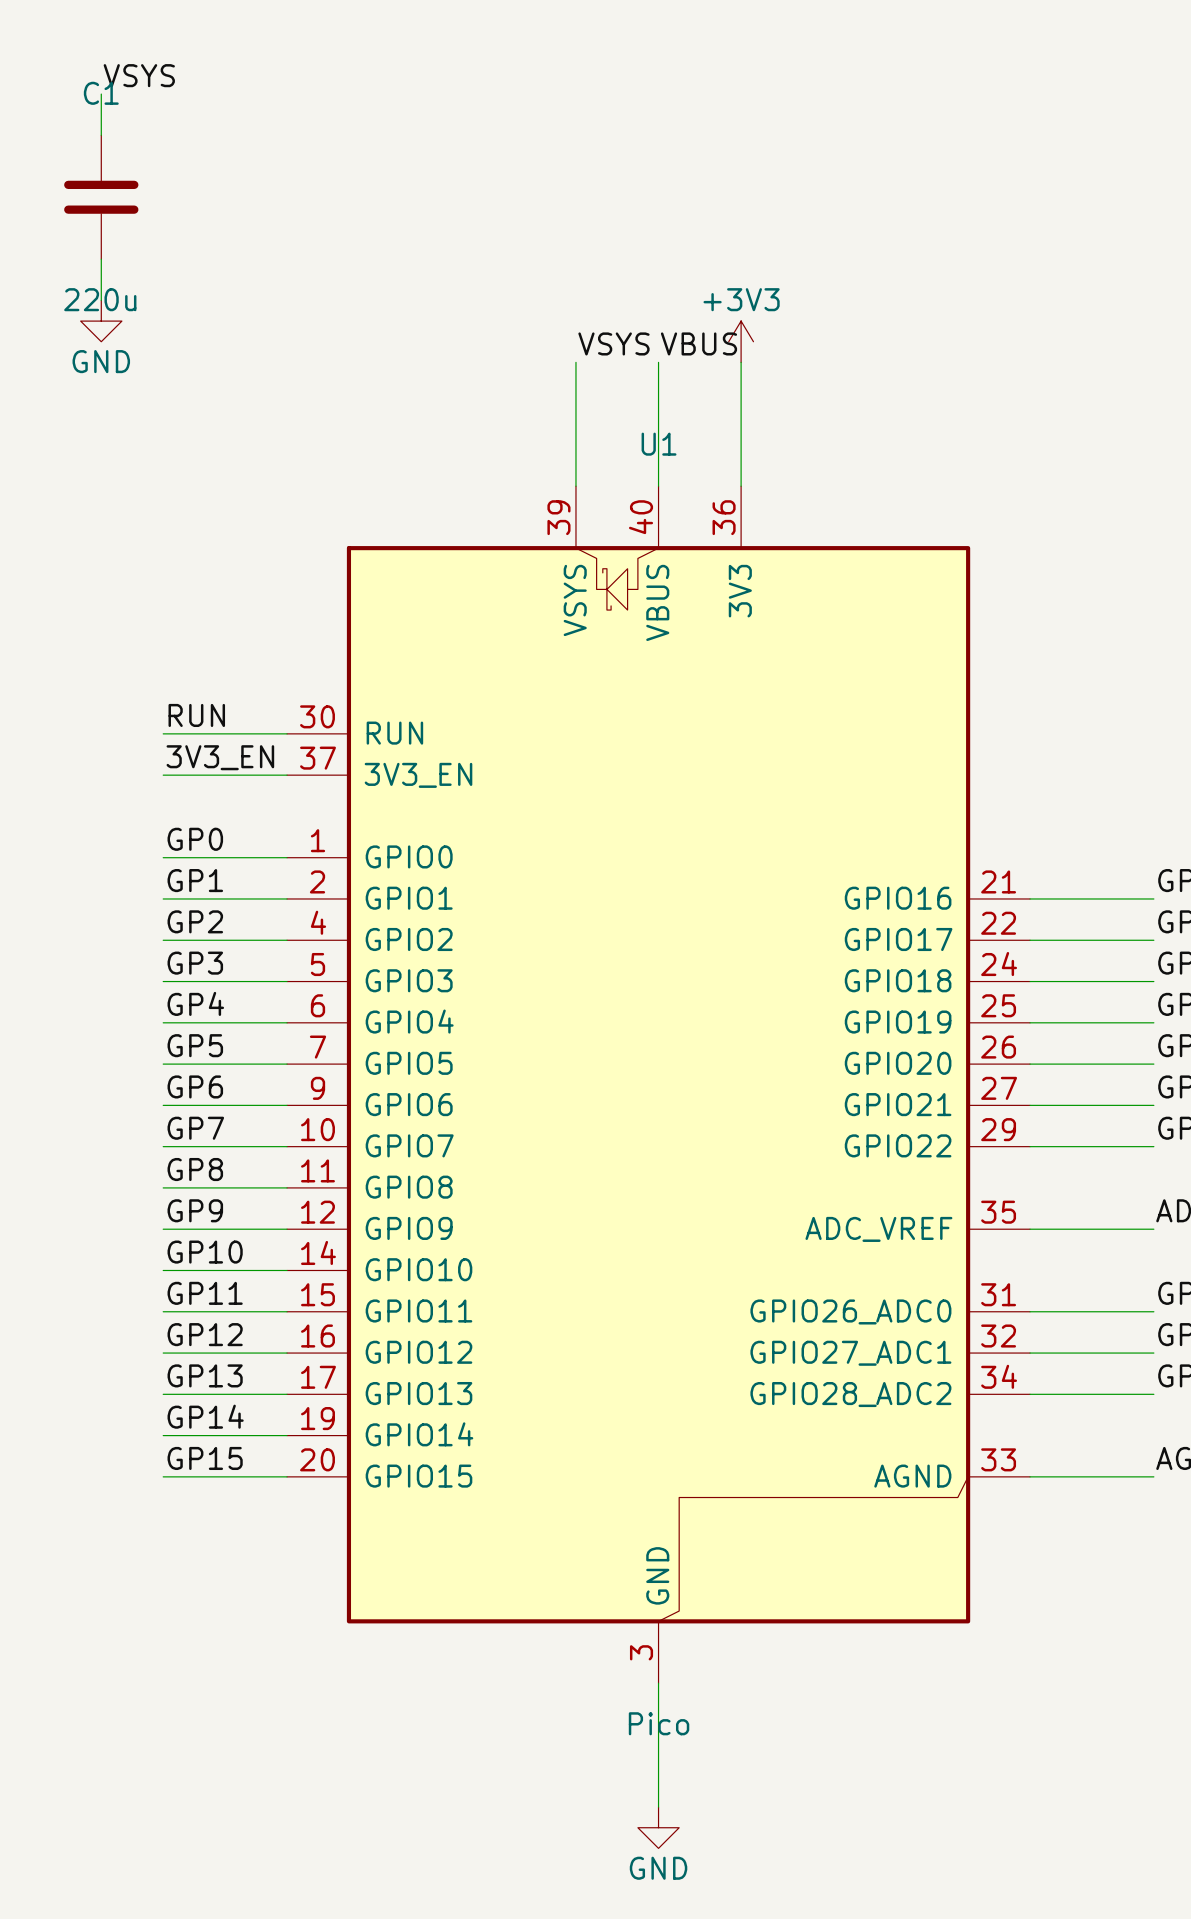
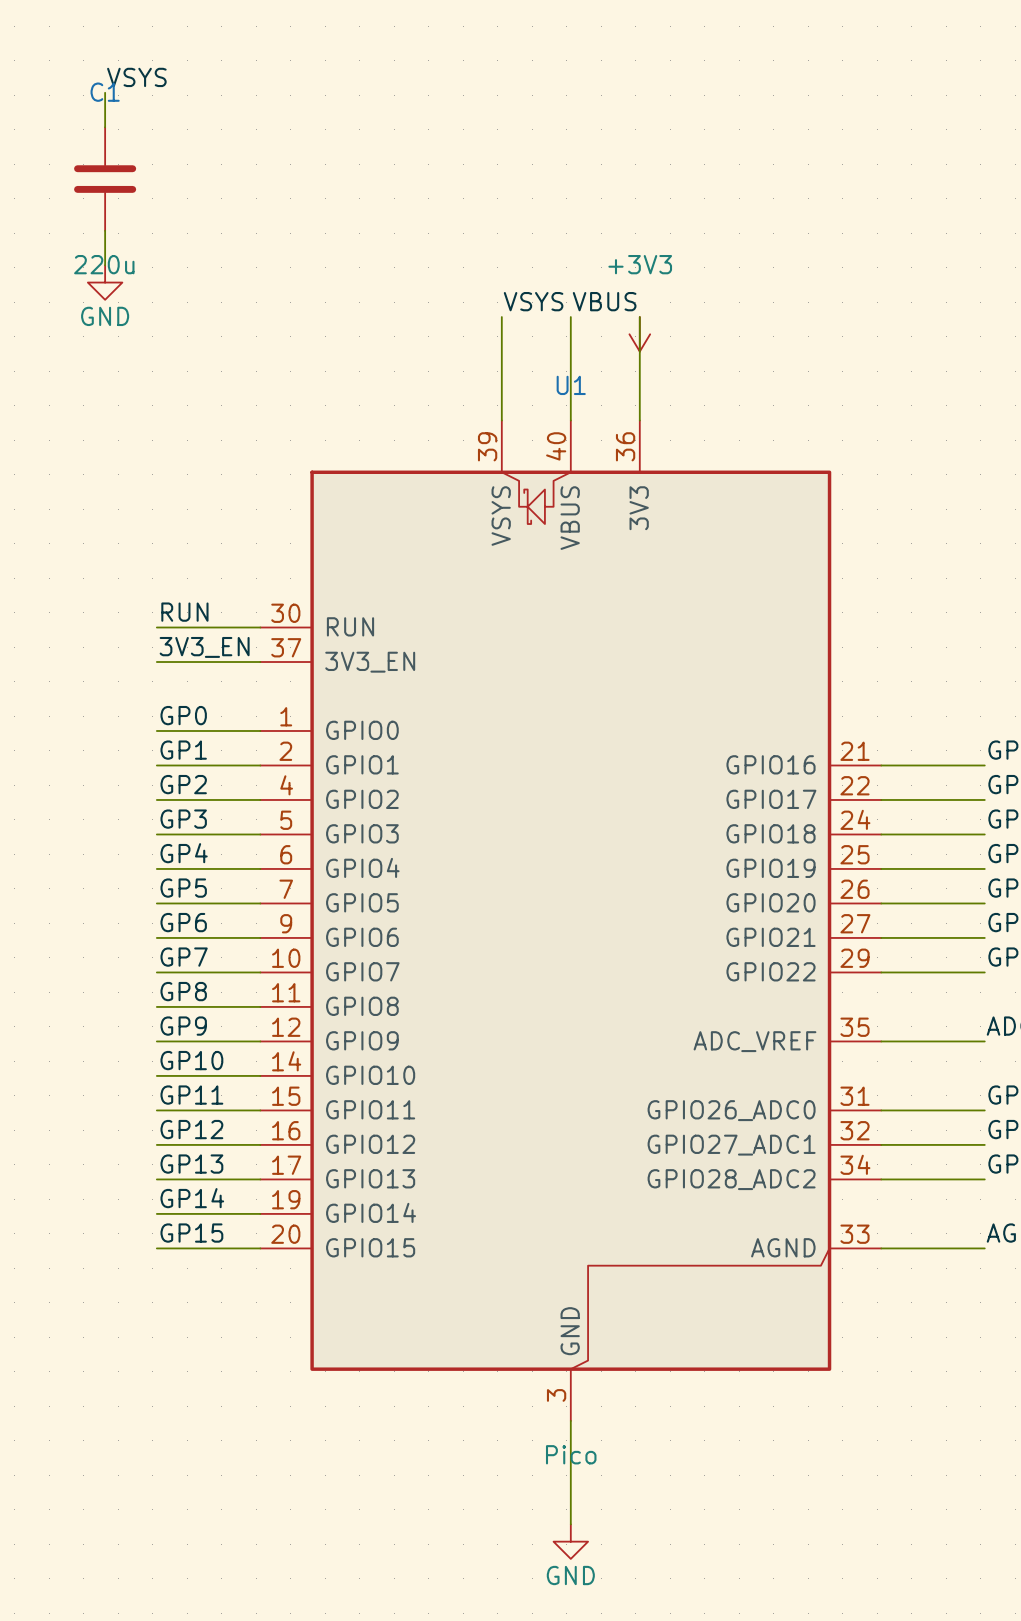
power symbol rotation: 0° (741, 341) -> 180° (639, 334)
power symbol position: +3V3 (741, 341) -> +3V3 (639, 334)

